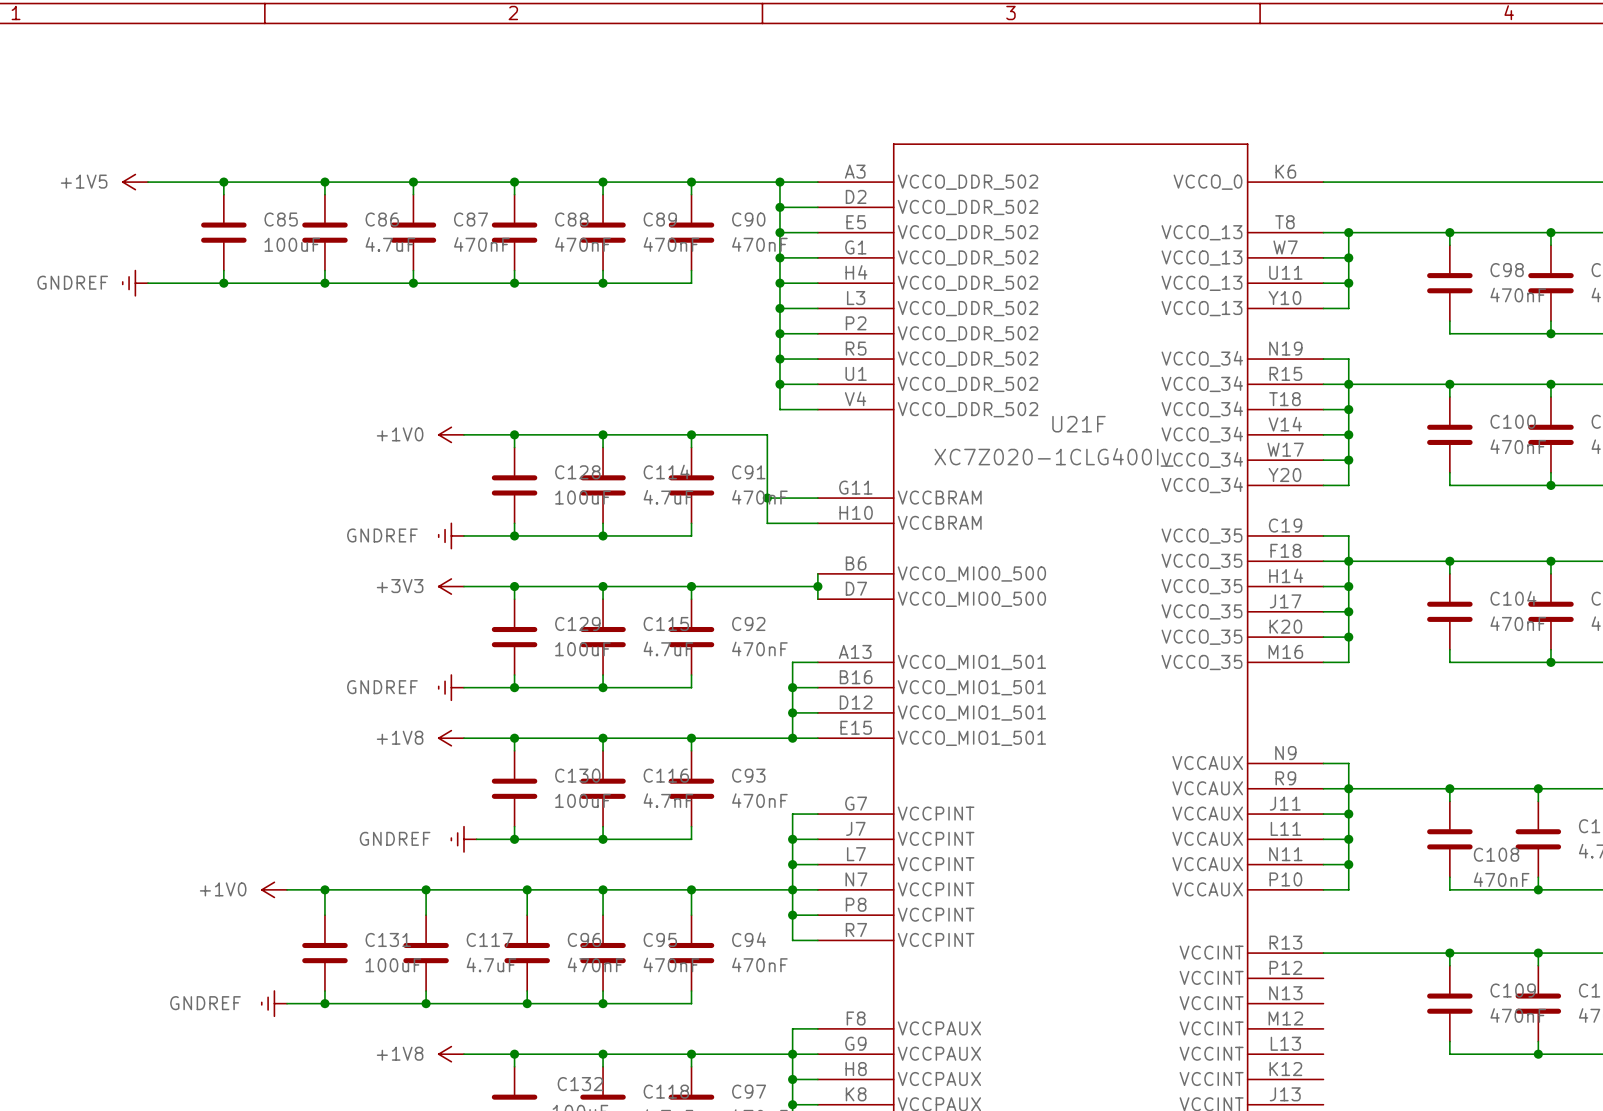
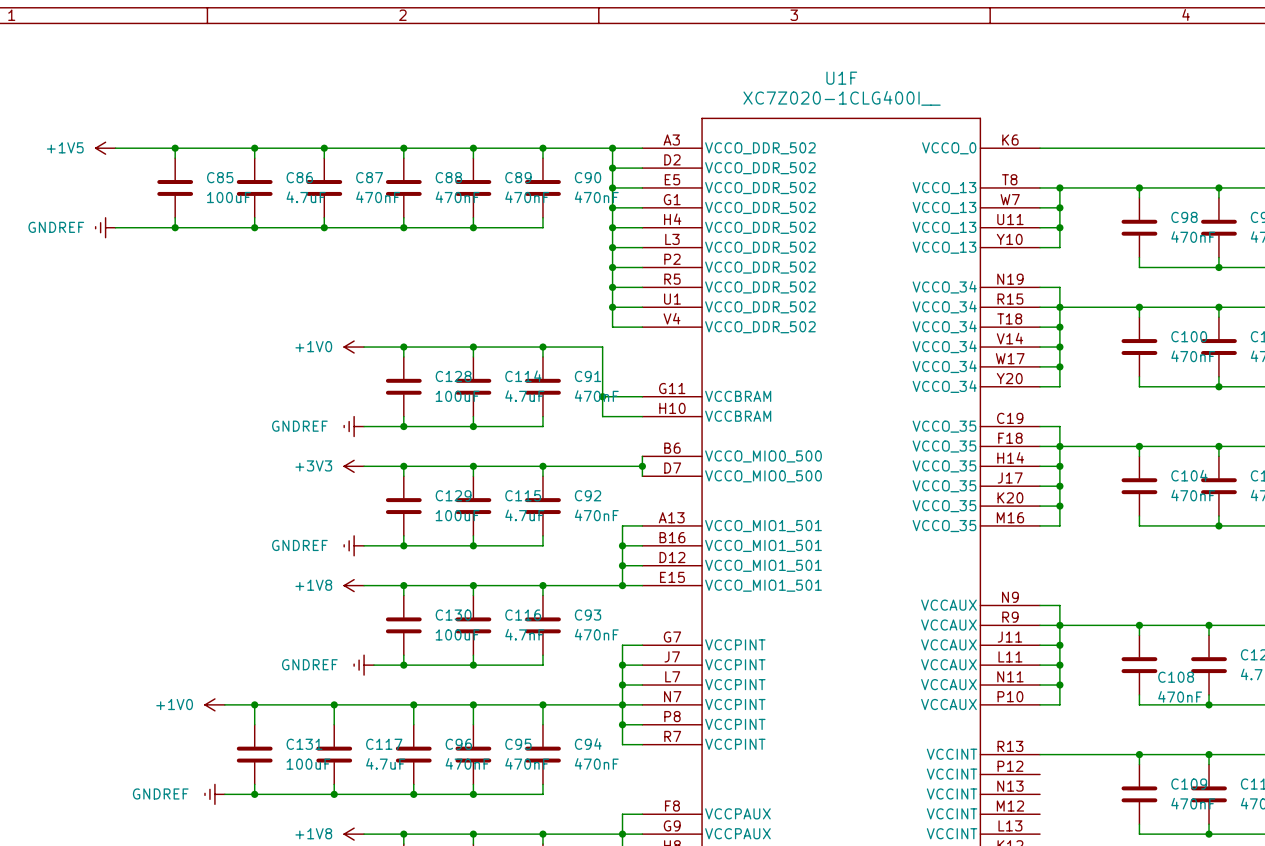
U21F name: U21F (1078, 424) -> U1F (841, 78)
U21F value: XC7Z020-1CLG400I_ (1054, 457) -> XC7Z020-1CLG400I__ (842, 98)

